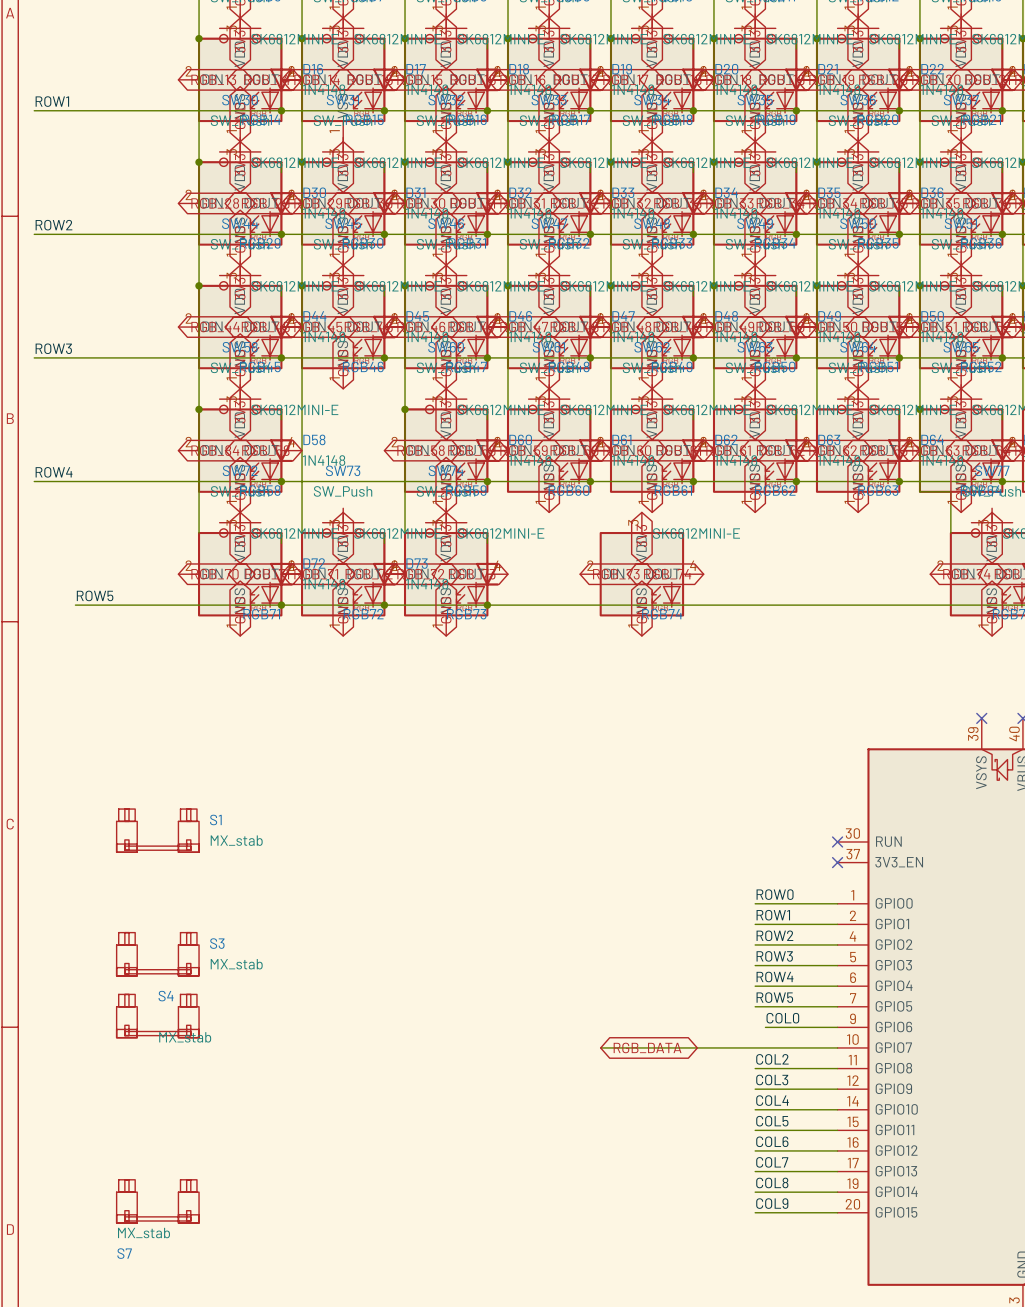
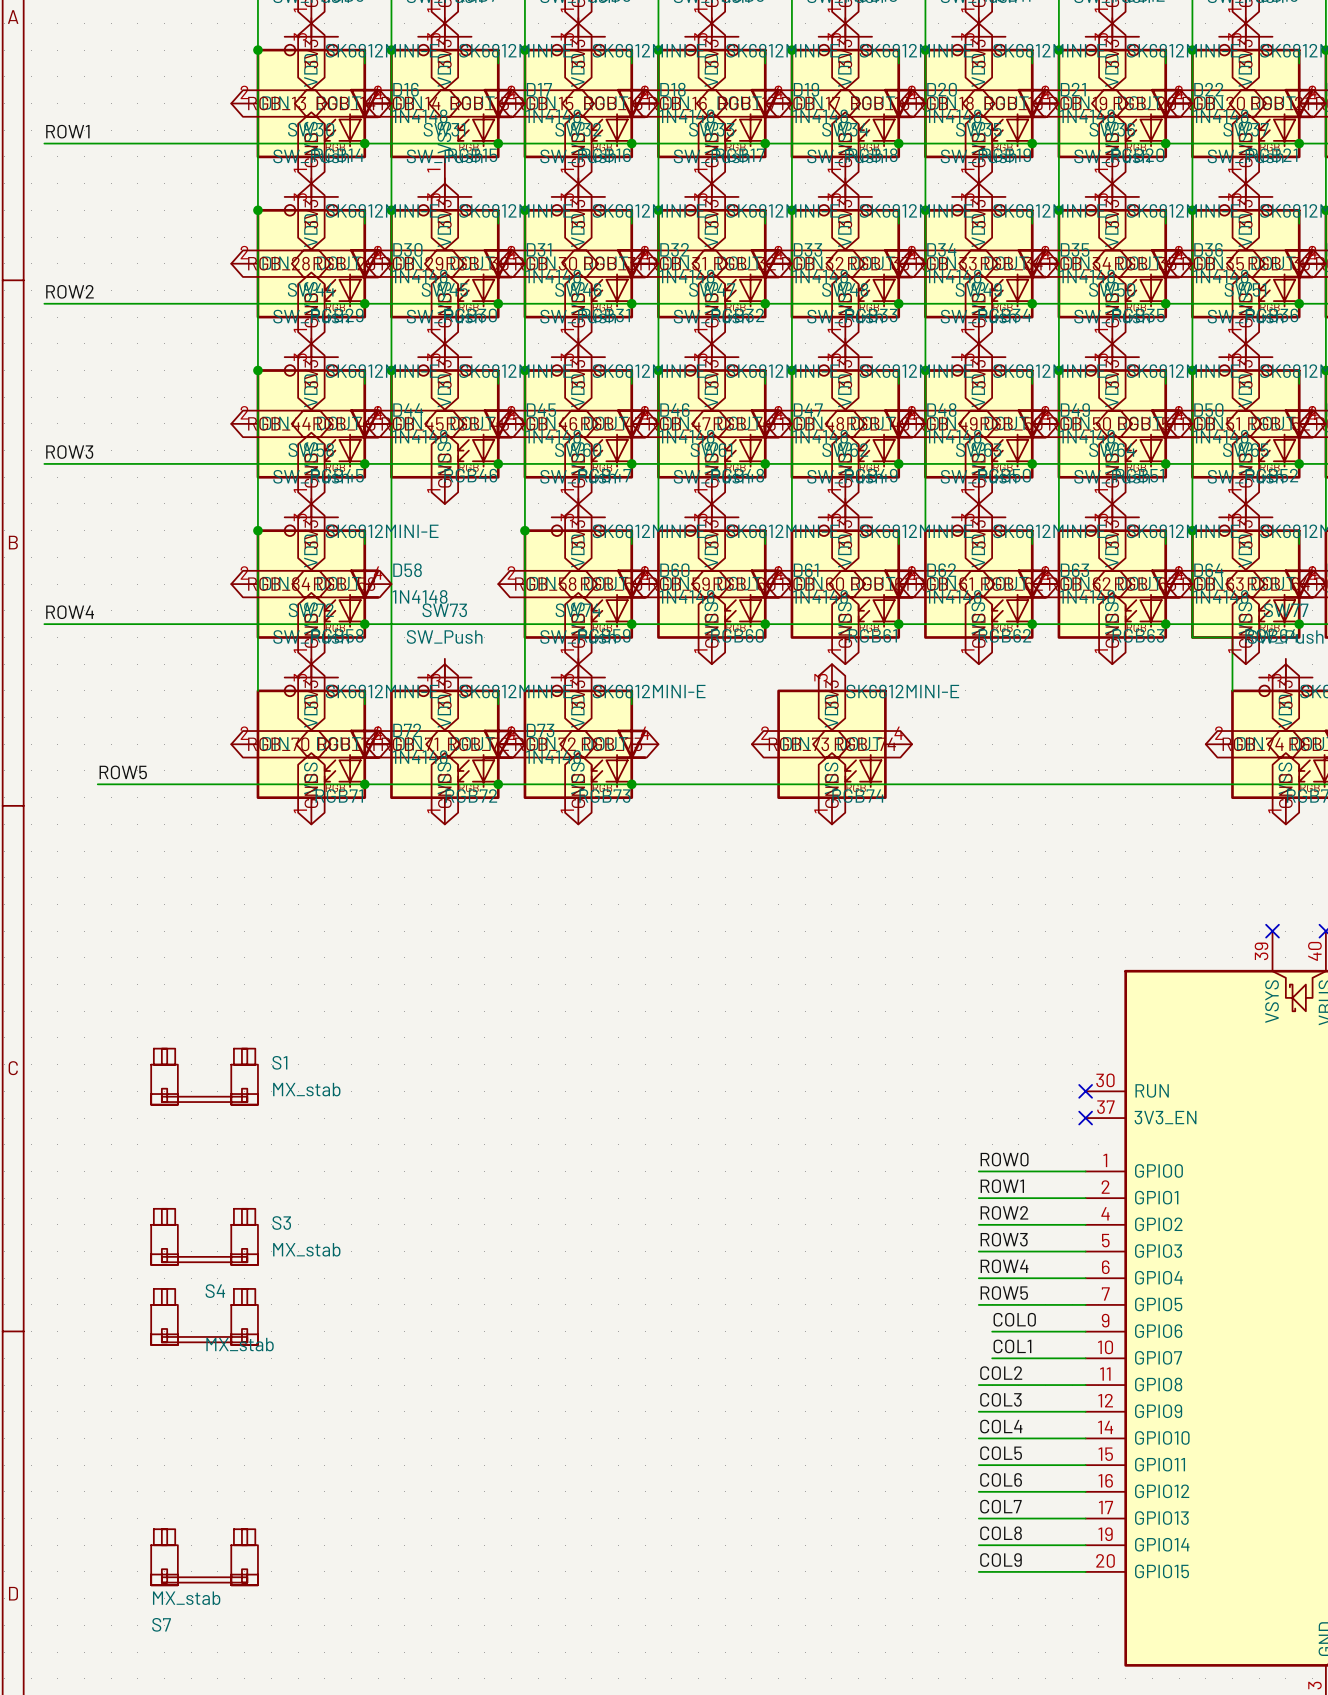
label: none -> COL1 (1012, 1346)
wire: (600, 1047) (765, 1047) -> none
global label: RGB_DATA (647, 1047) -> none

